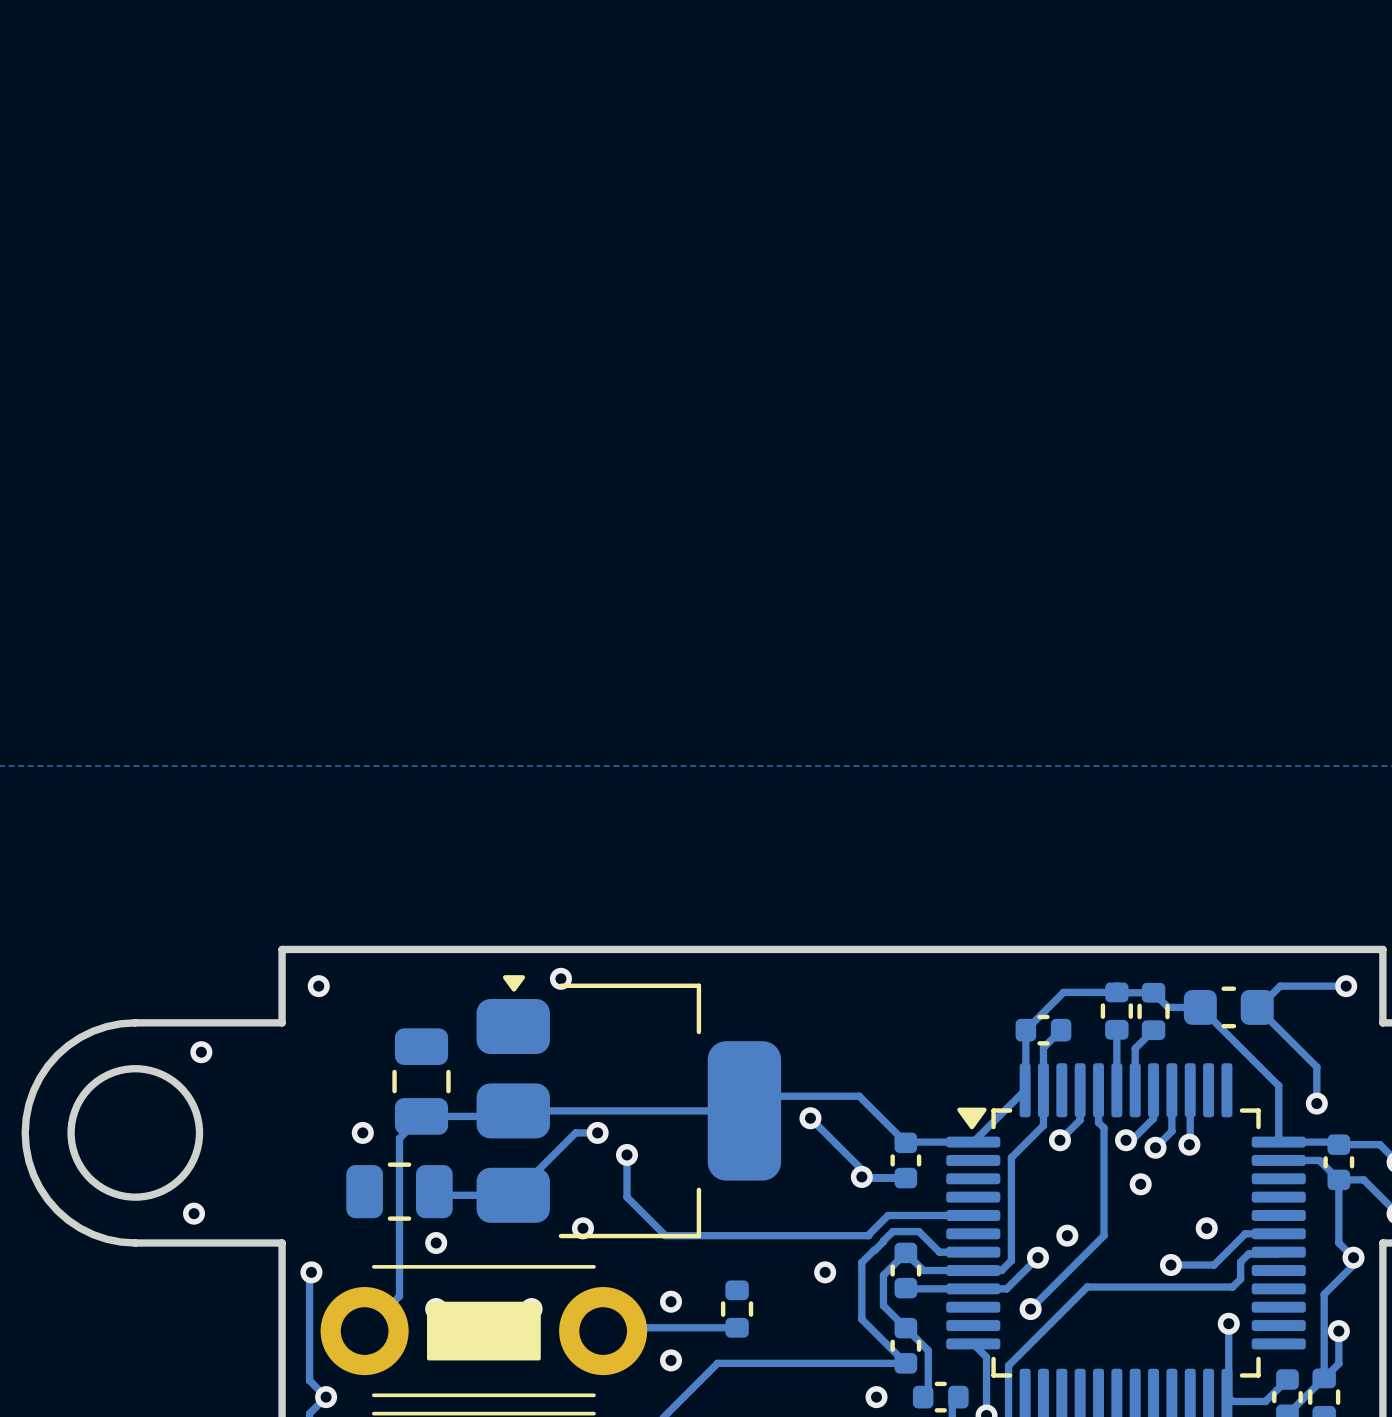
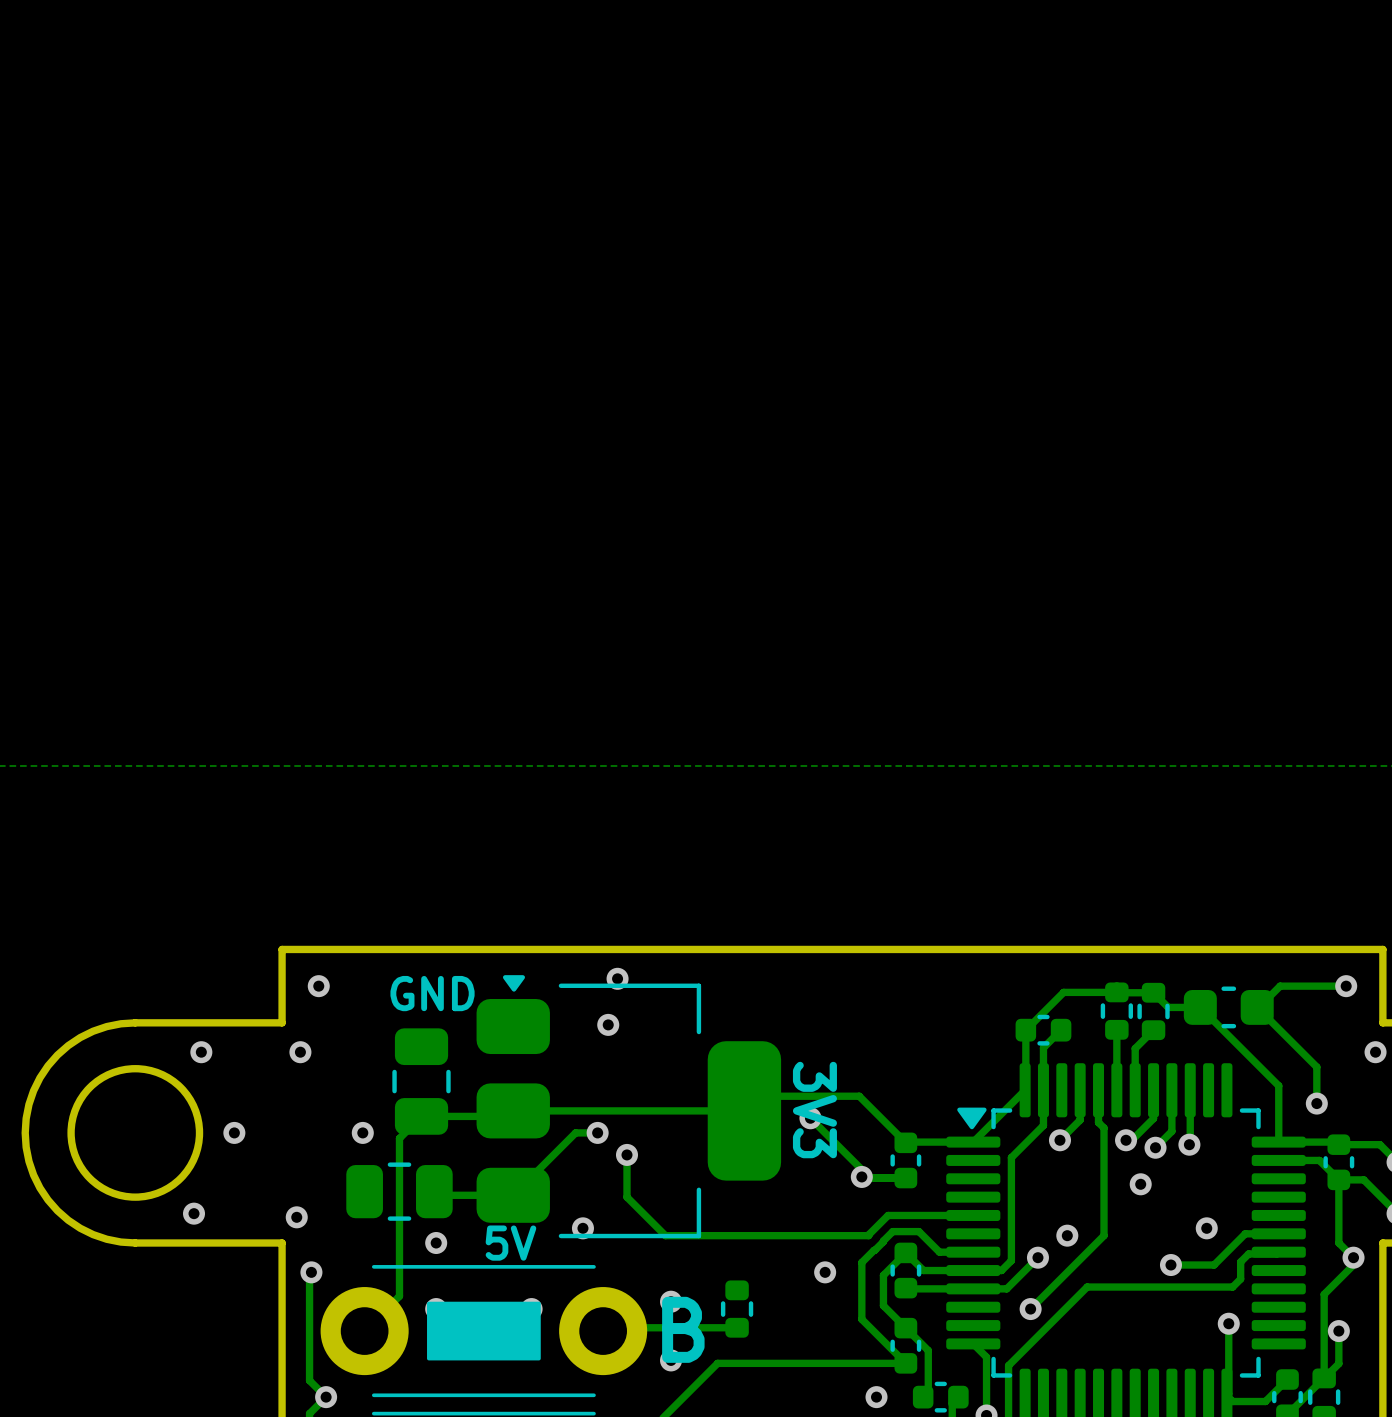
via: (560, 978) -> none
via: none -> (617, 978)
text: none -> GND (432, 993)
via: none -> (608, 1024)
via: none -> (300, 1052)
via: none -> (1375, 1052)
text: none -> 3V3 (814, 1110)
via: none -> (234, 1132)
via: none -> (296, 1217)
text: none -> 5V (510, 1243)
text: none -> B (683, 1329)

